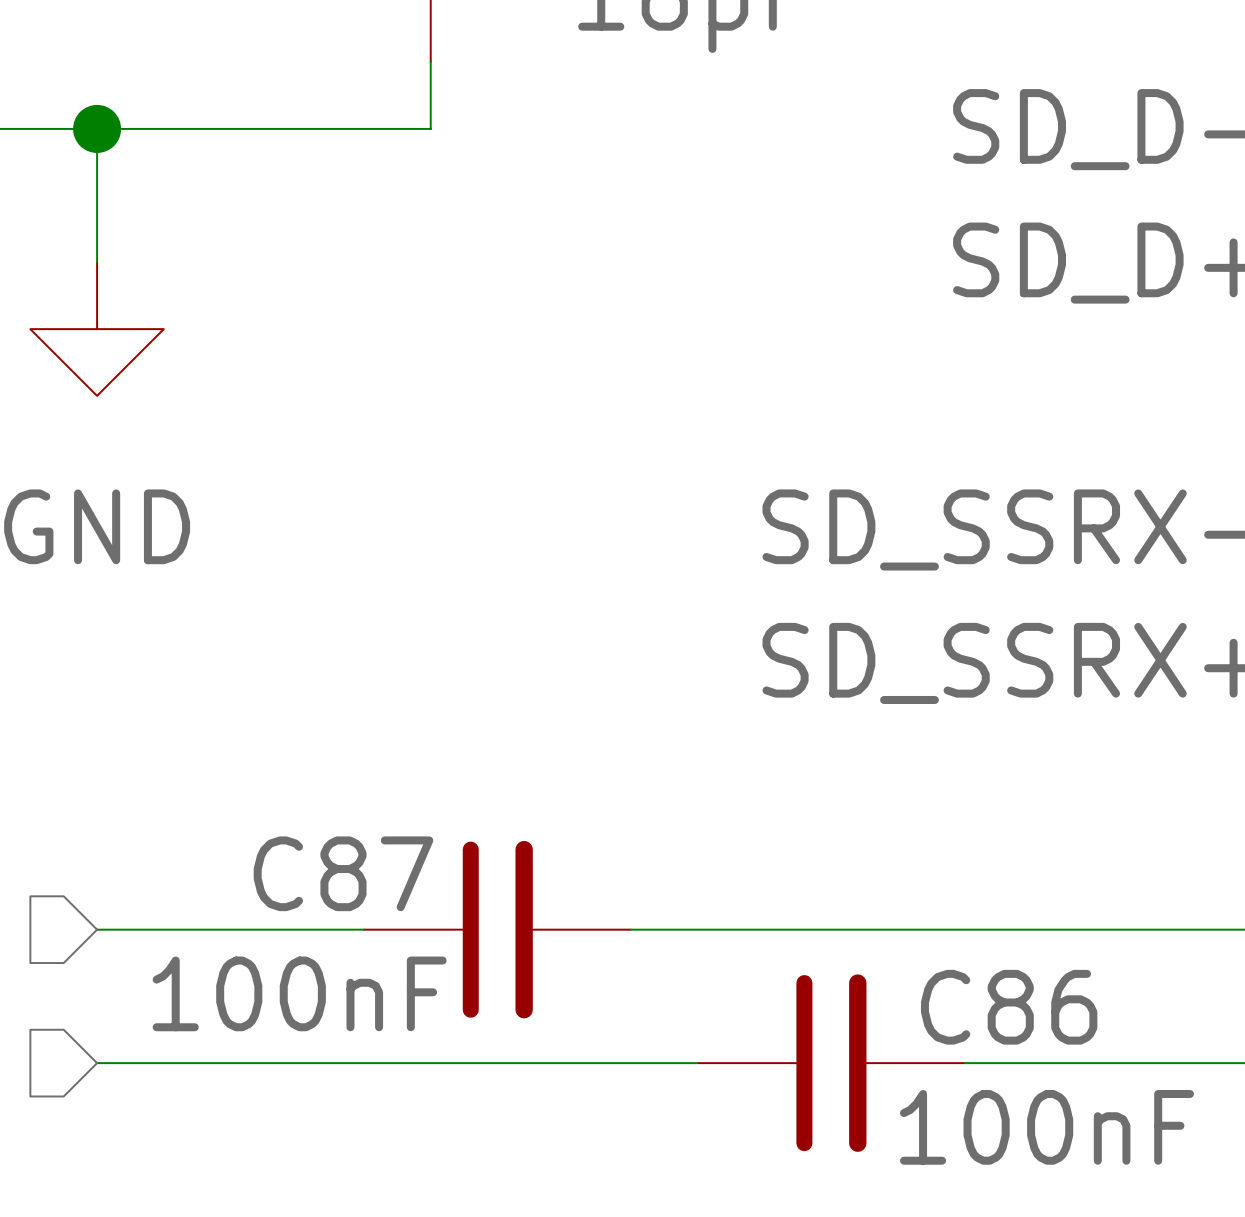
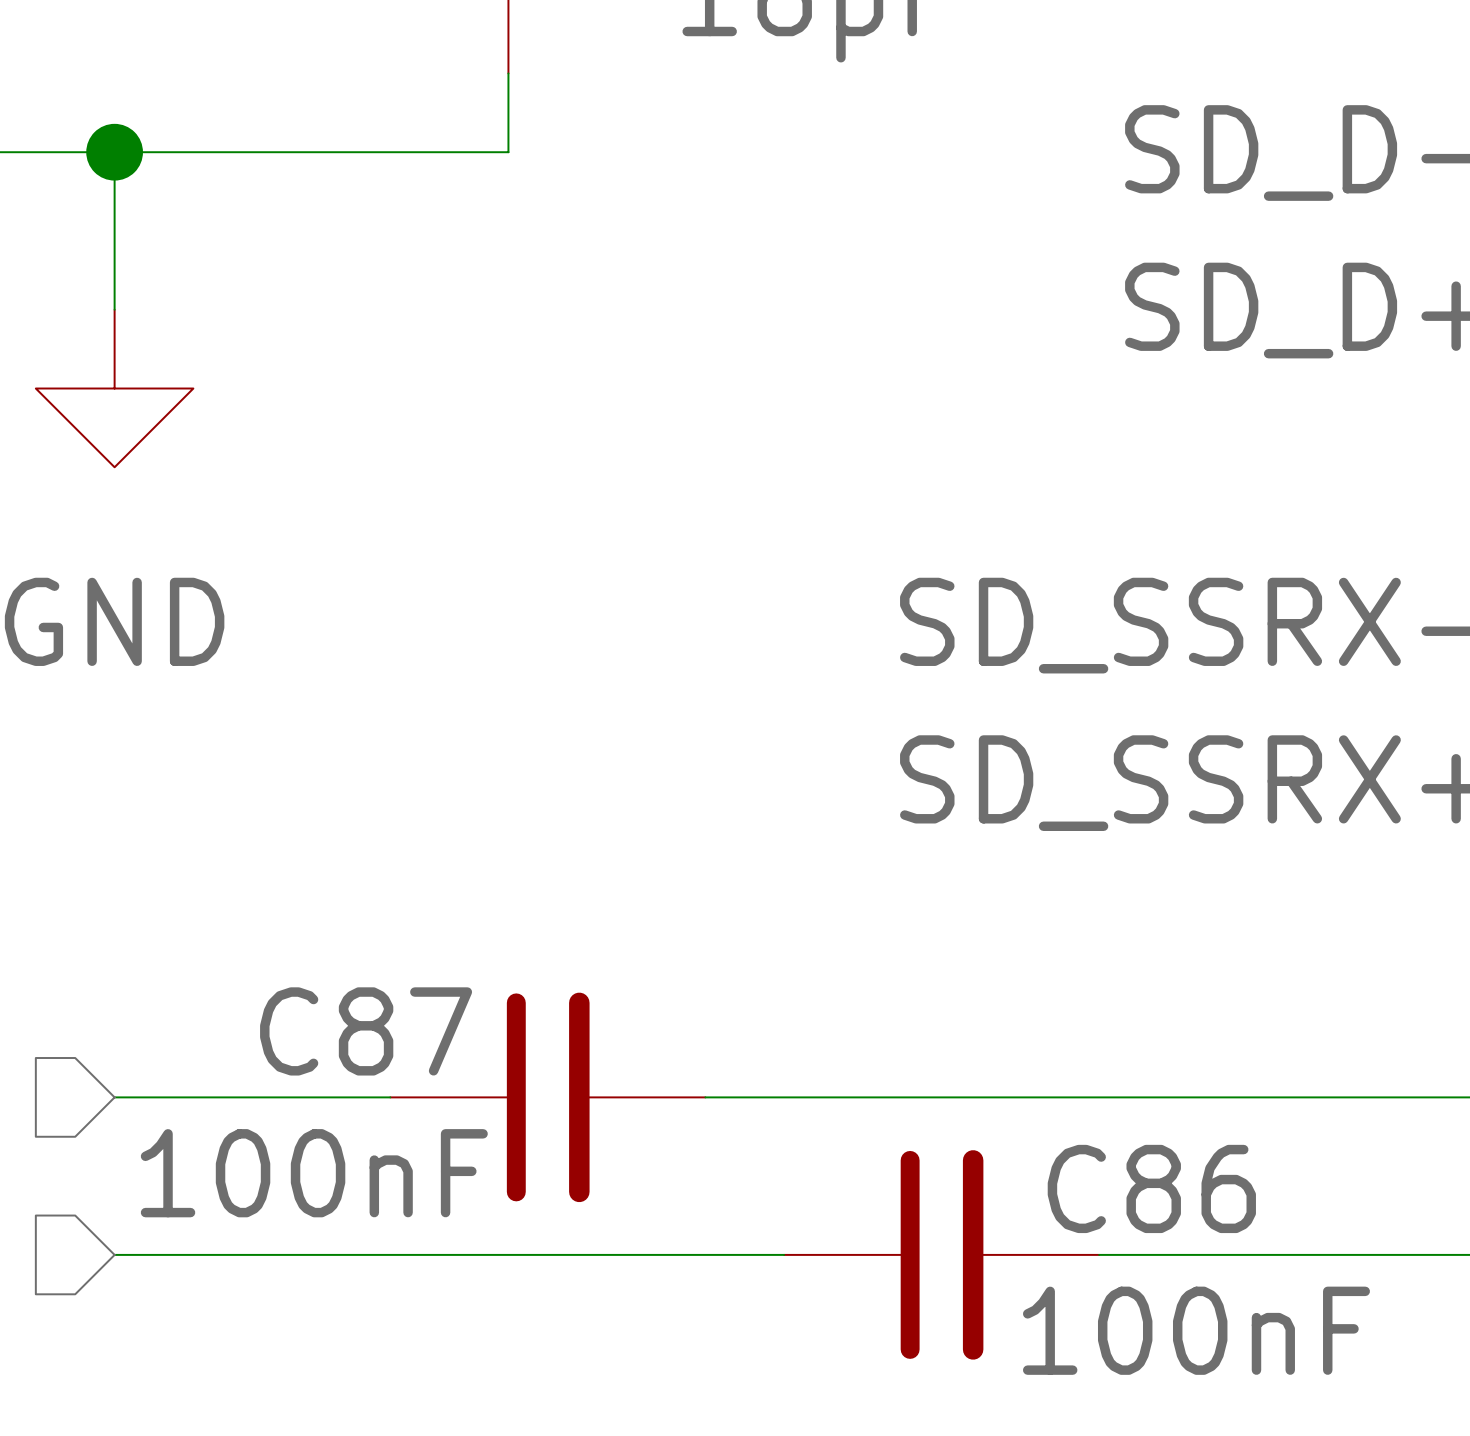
C87 position: (497, 929) -> (547, 1097)
C86 position: (831, 1063) -> (941, 1254)

